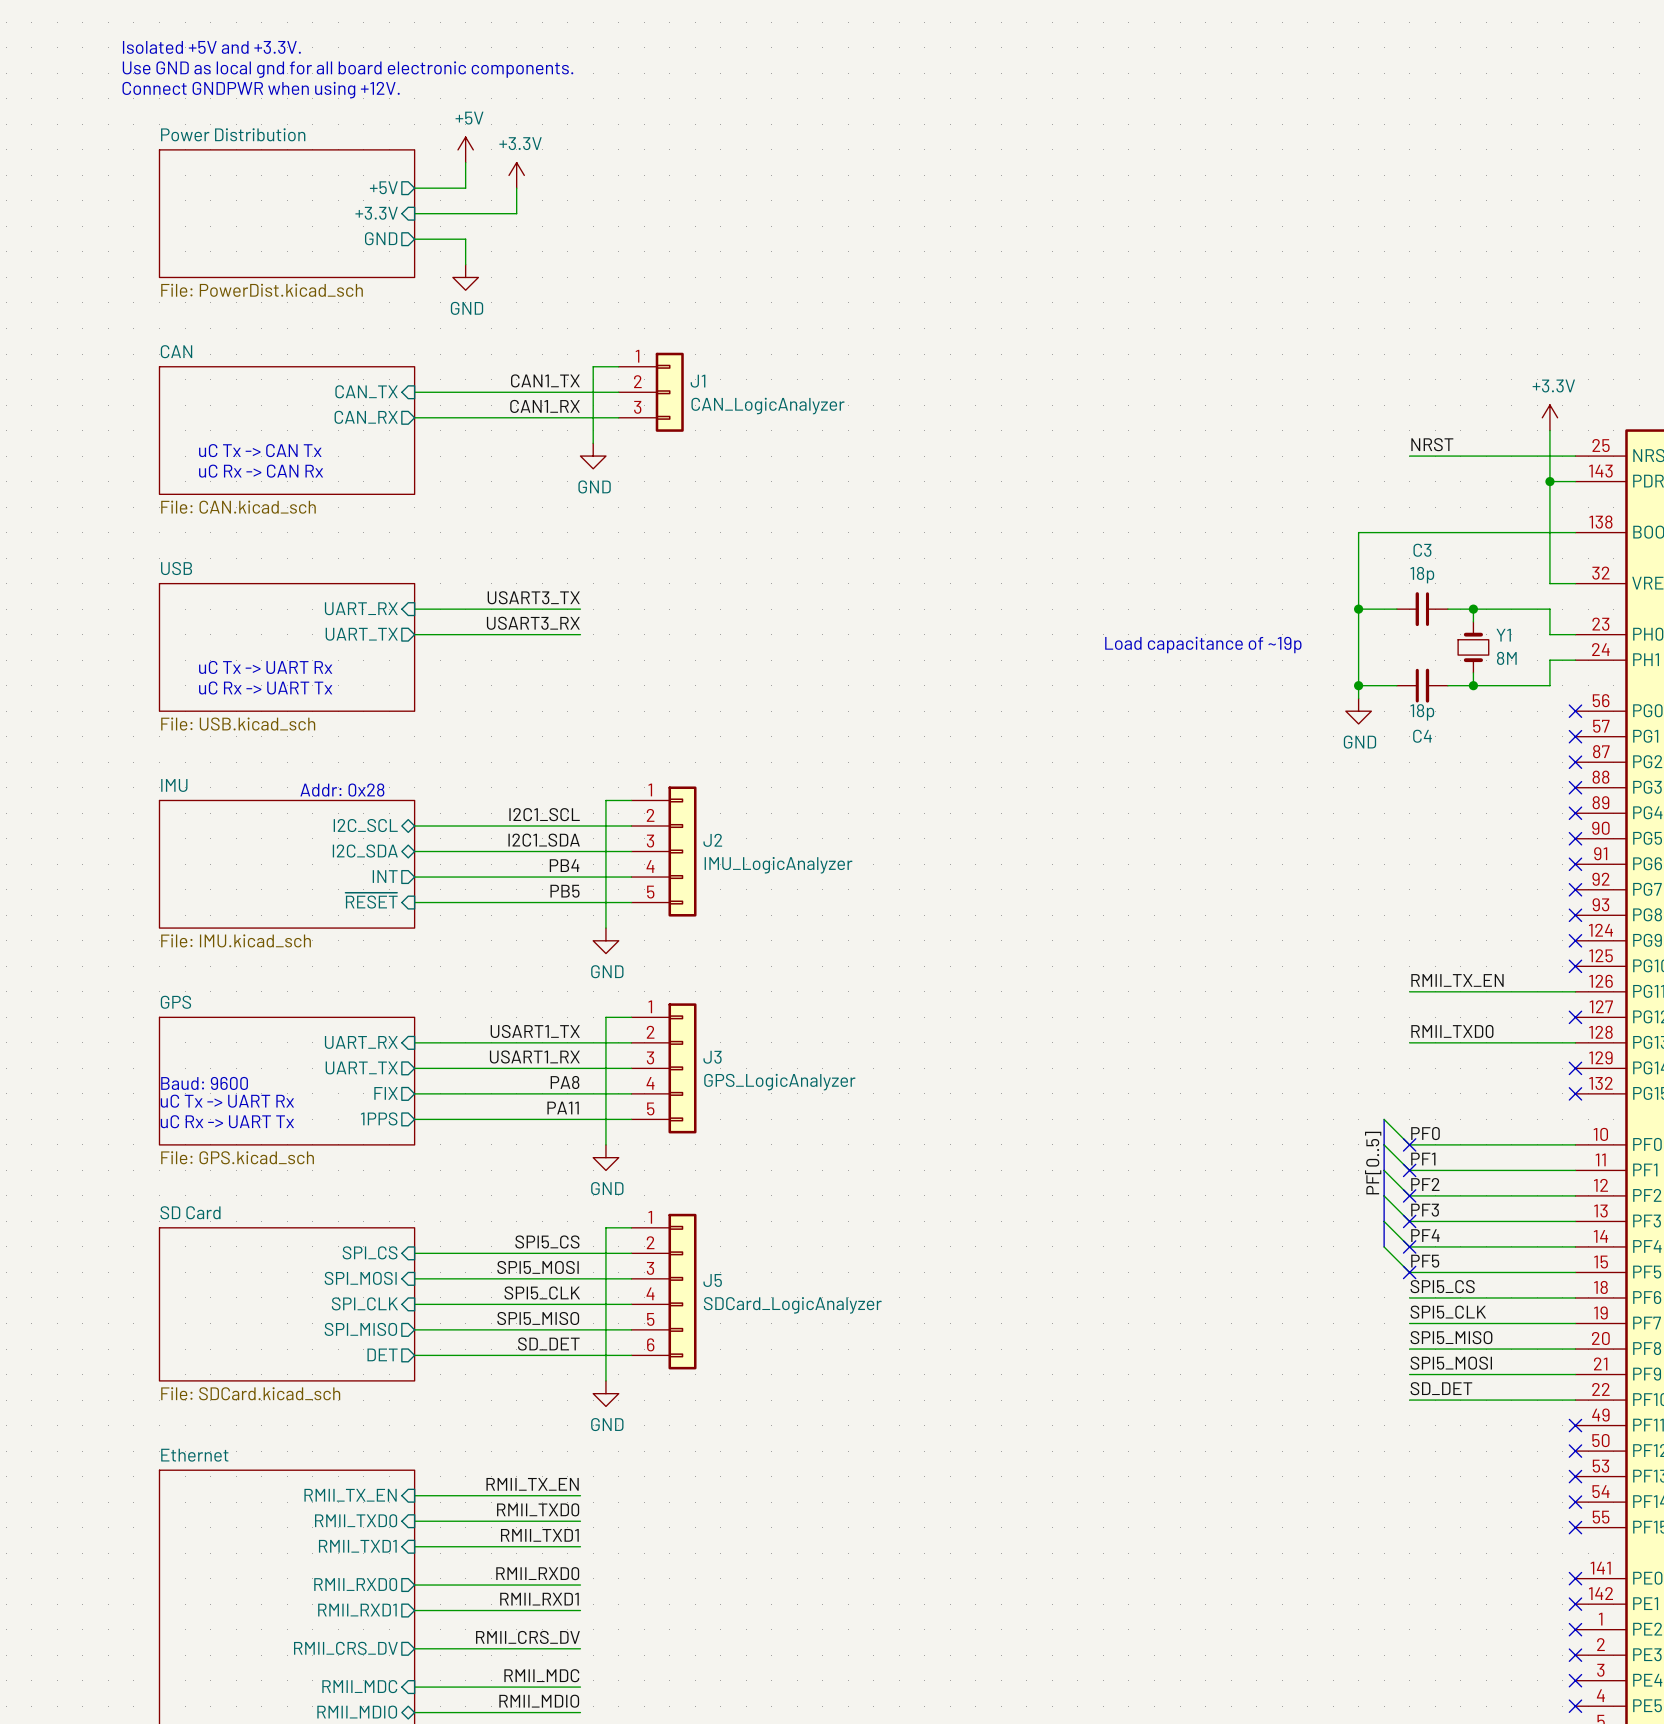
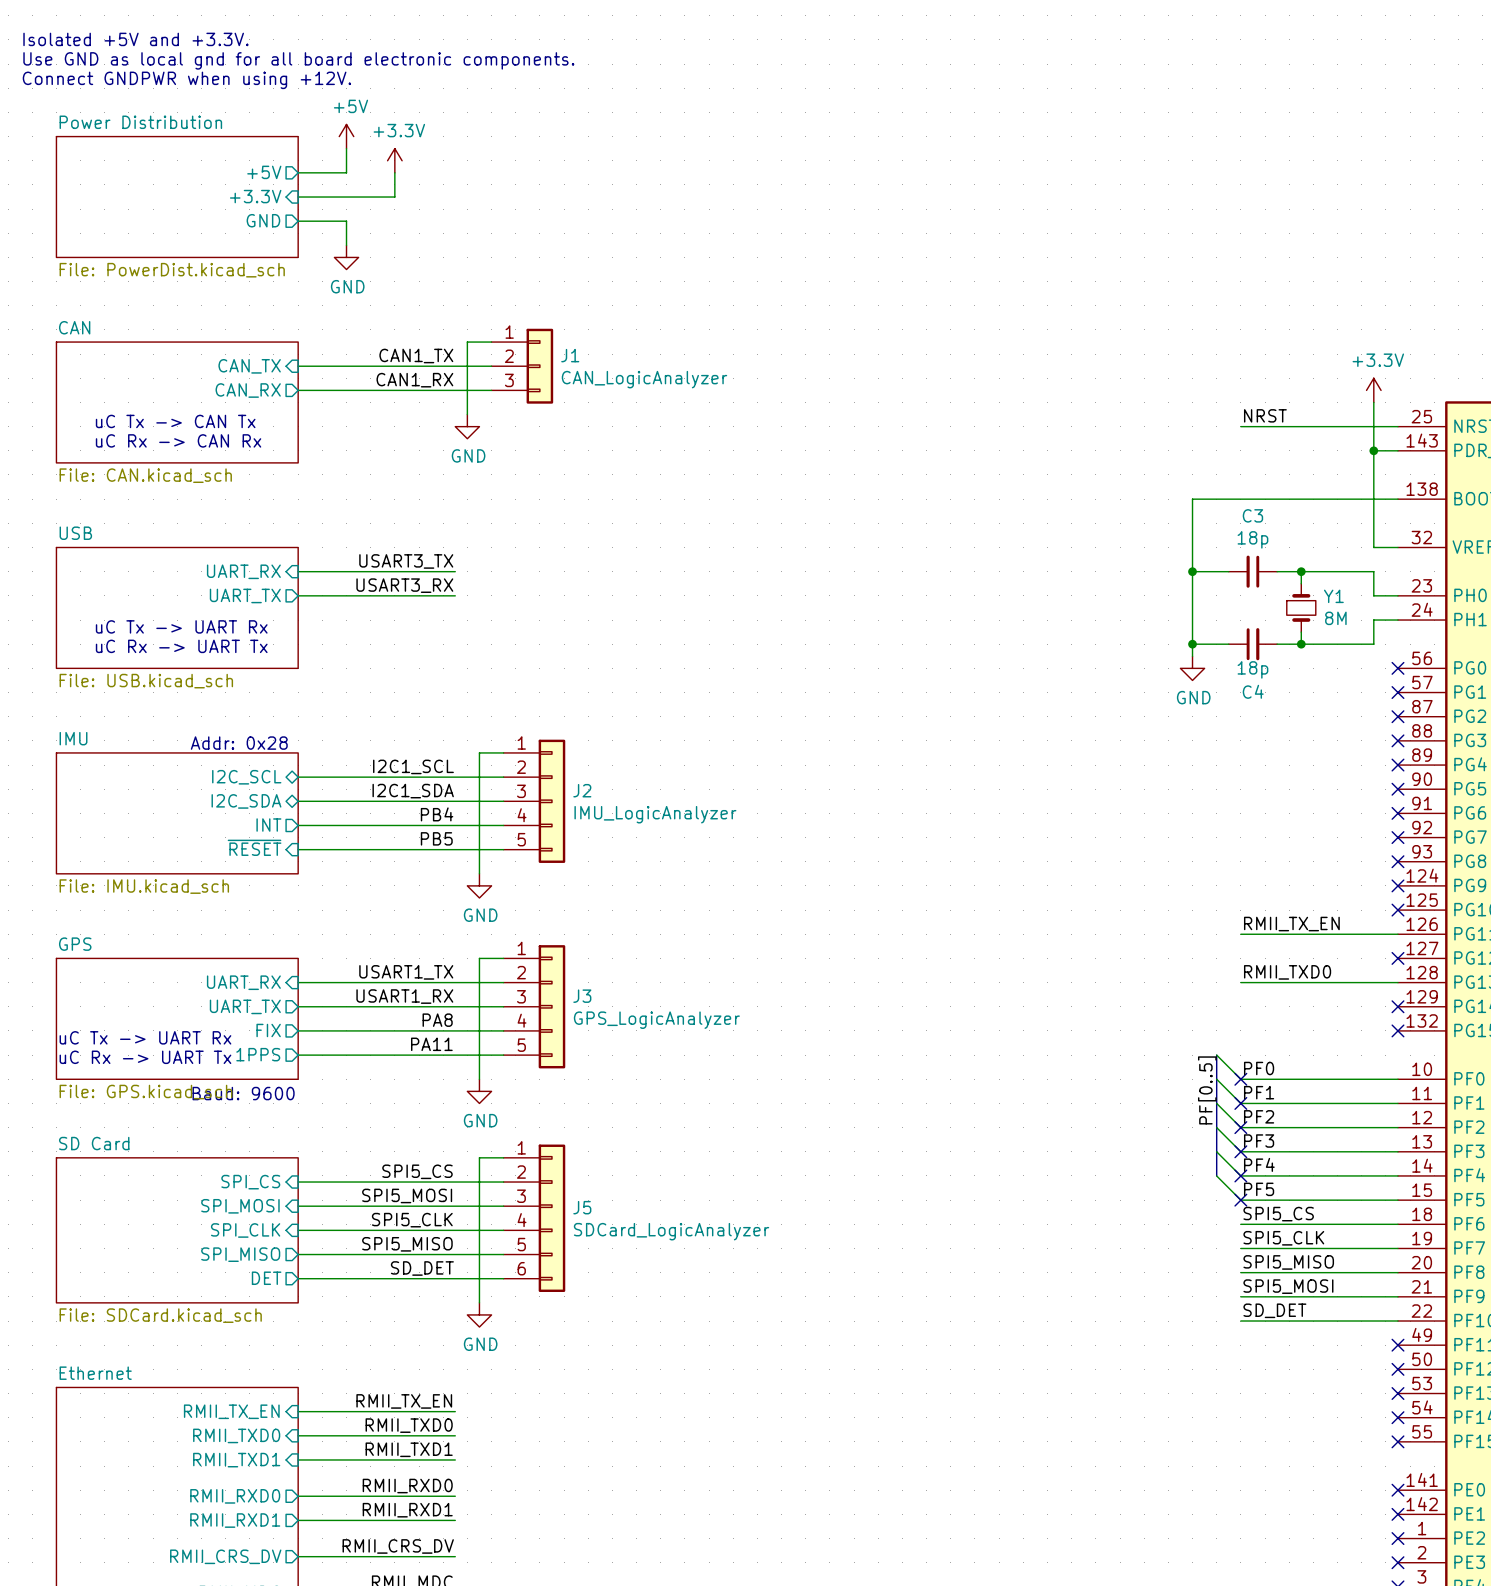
text: Load capacitance of ~19p (1203, 645) -> none
text position: Baud: 9600 (204, 1083) -> Baud: 9600 (243, 1093)

